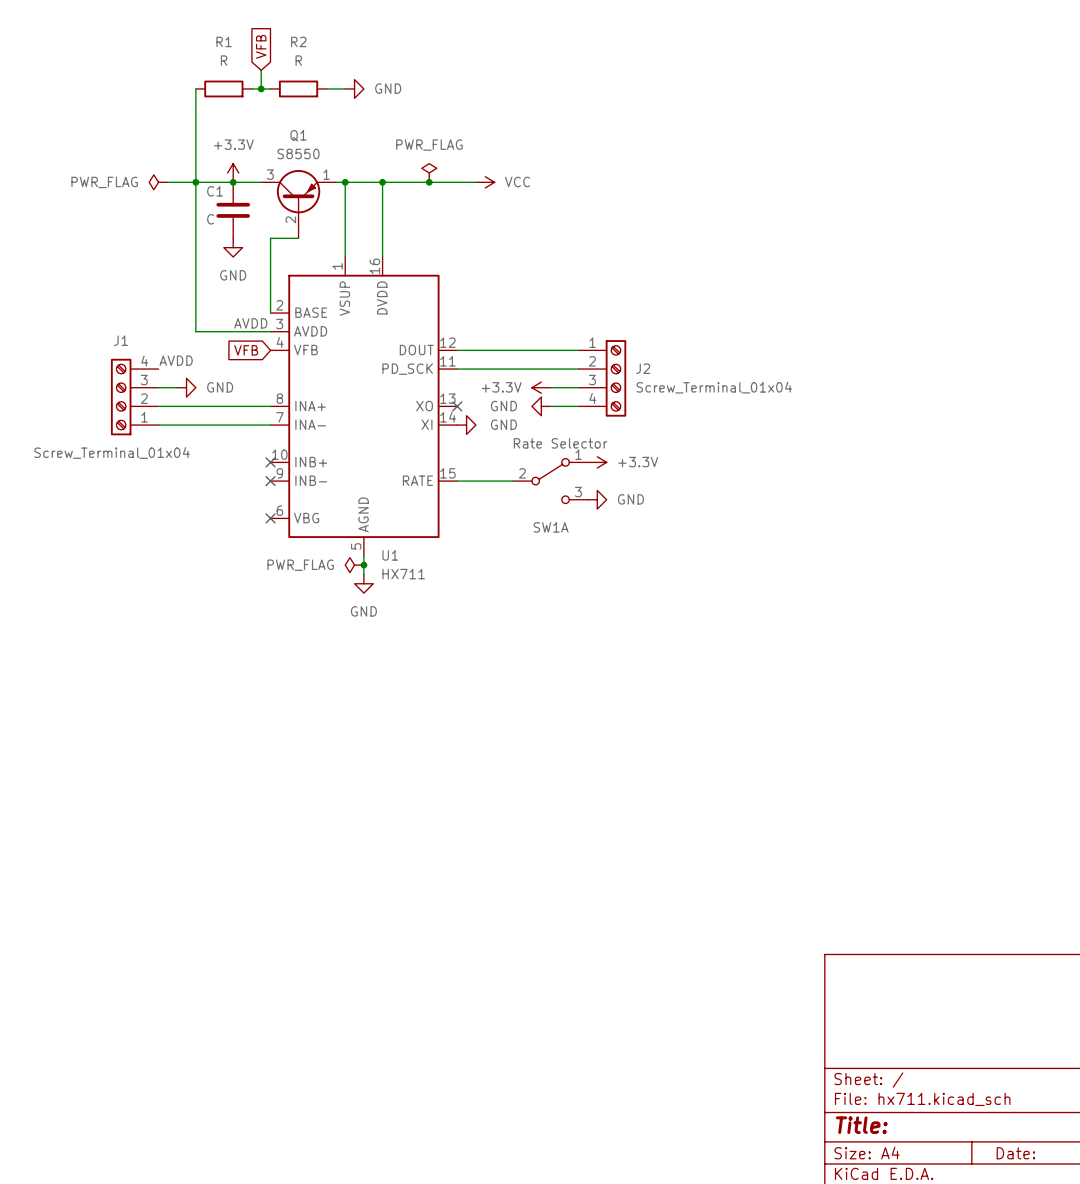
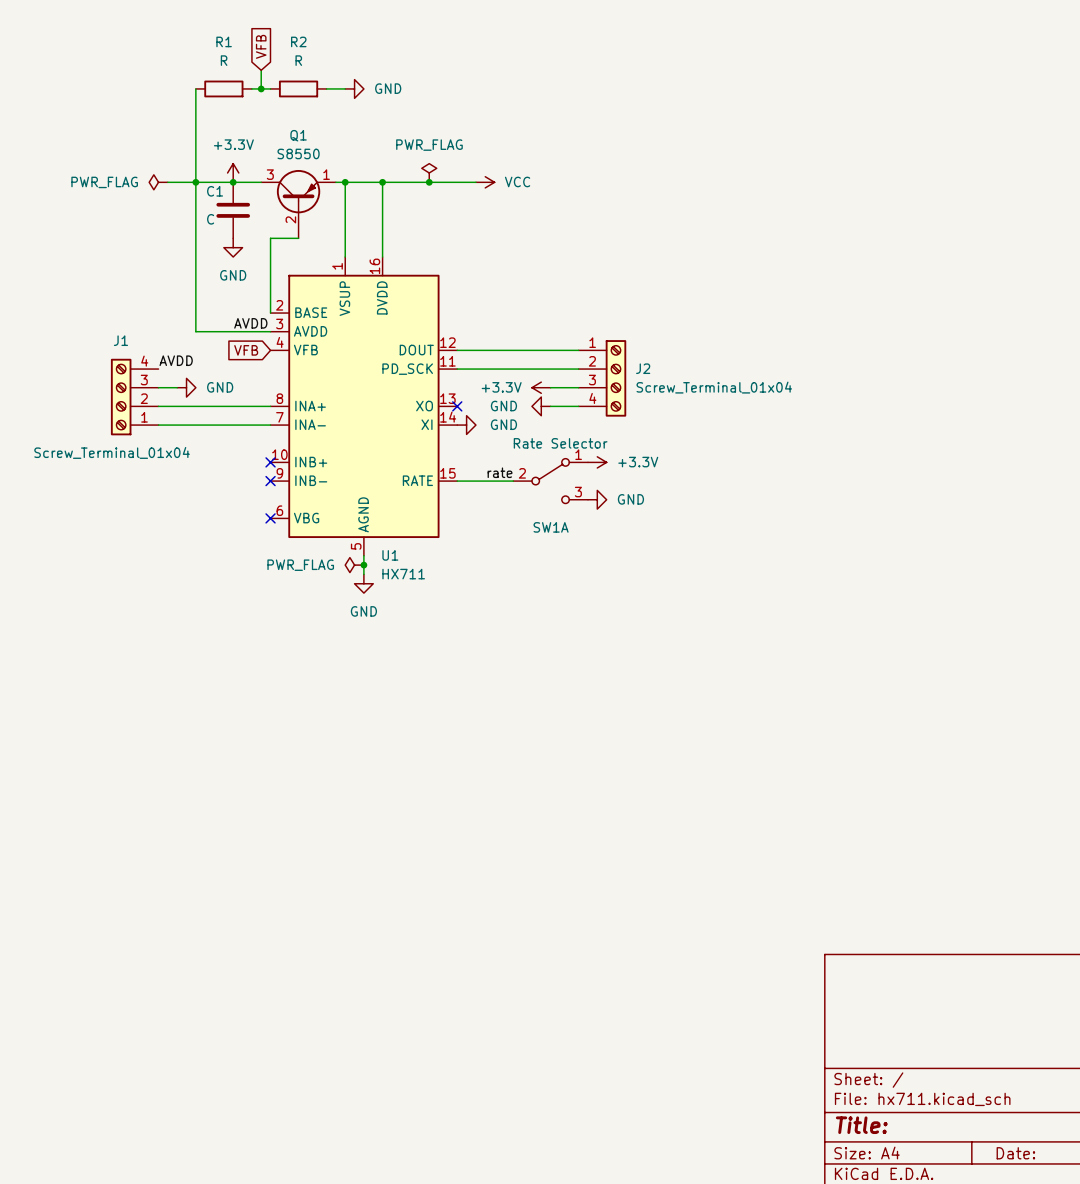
label: none -> rate (500, 472)

